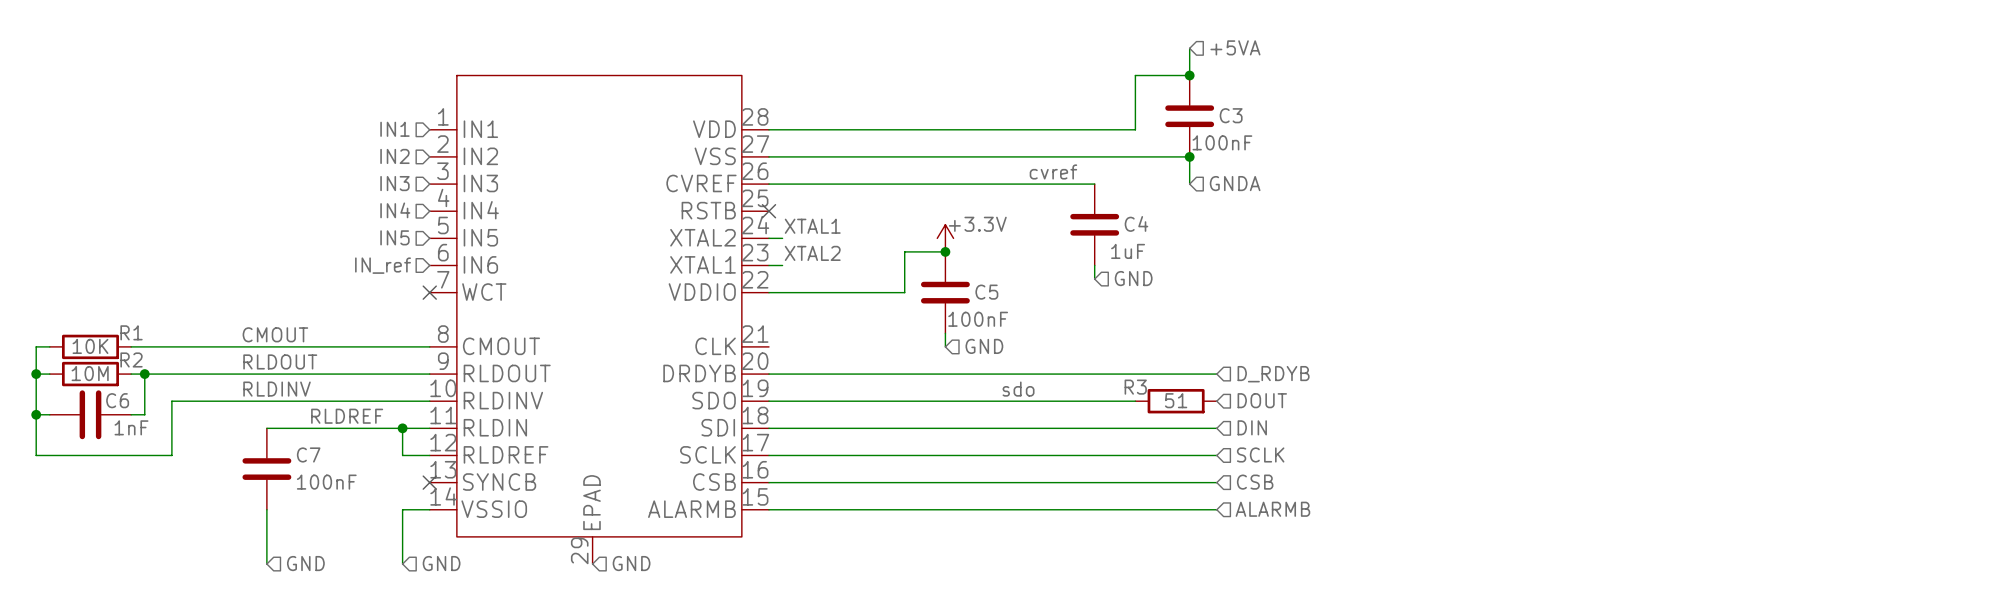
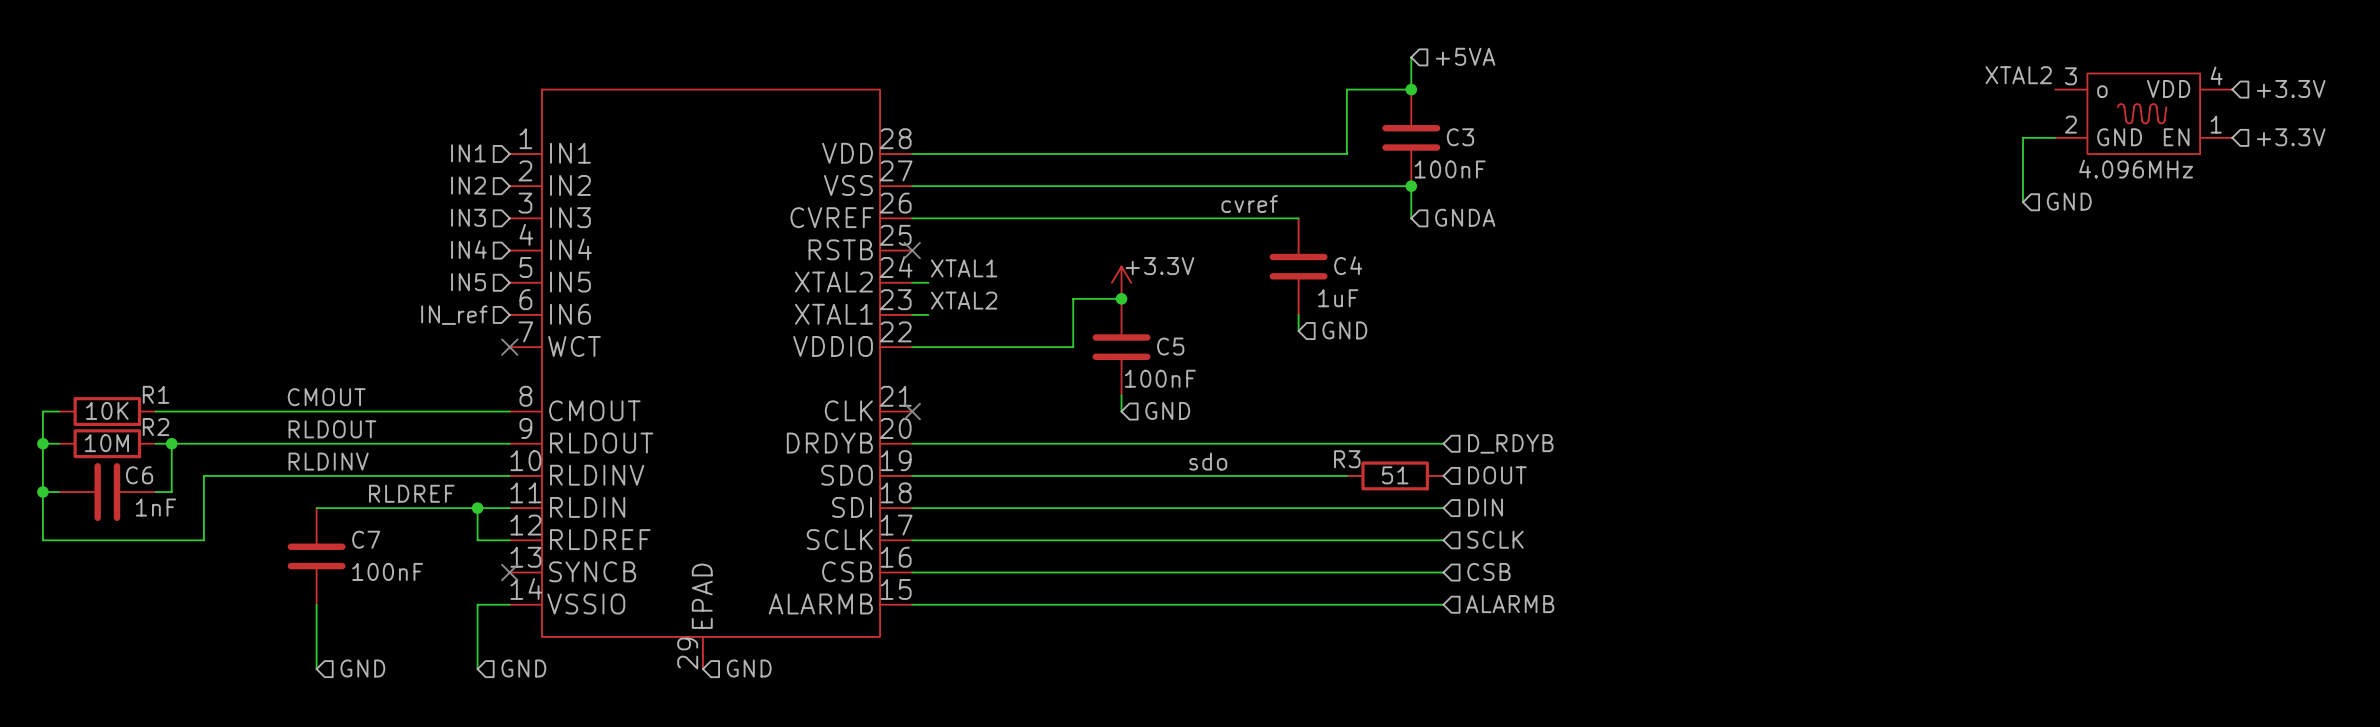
label: none -> XTAL2 (2018, 75)
hierarchical label: none -> +3.3V (2291, 88)
part: none -> 4.096MHz (2143, 113)
hierarchical label: none -> +3.3V (2291, 137)
wire: none -> (2055, 137) (2023, 137) (2023, 202)
hierarchical label: none -> GND (2069, 201)
no-connect mark: none -> (912, 411)

